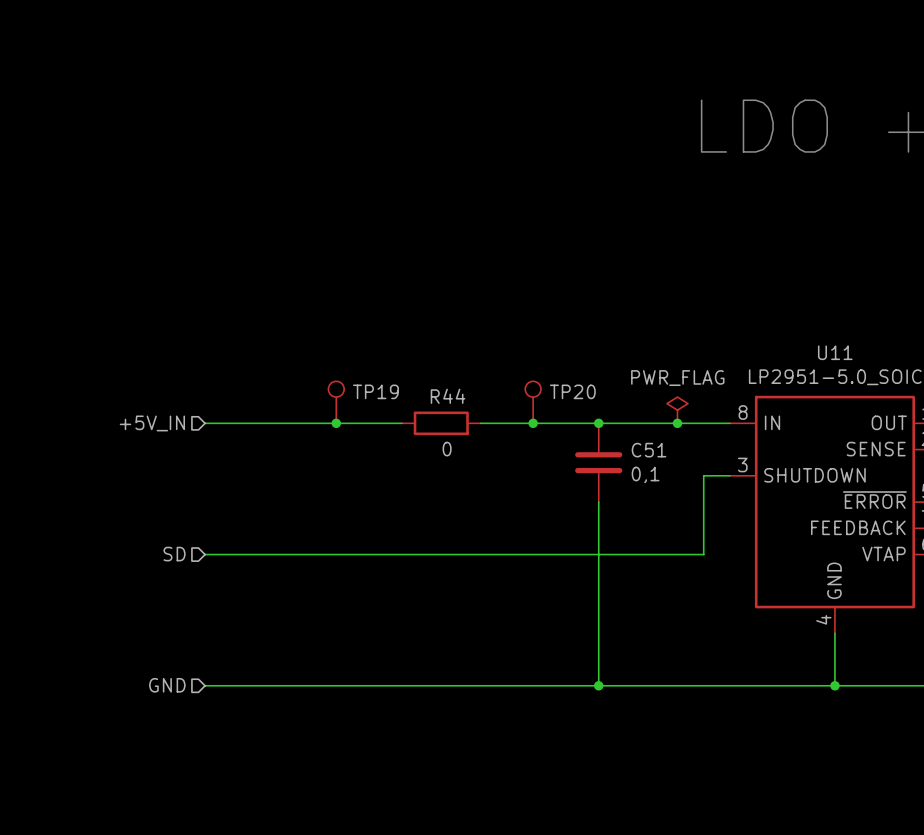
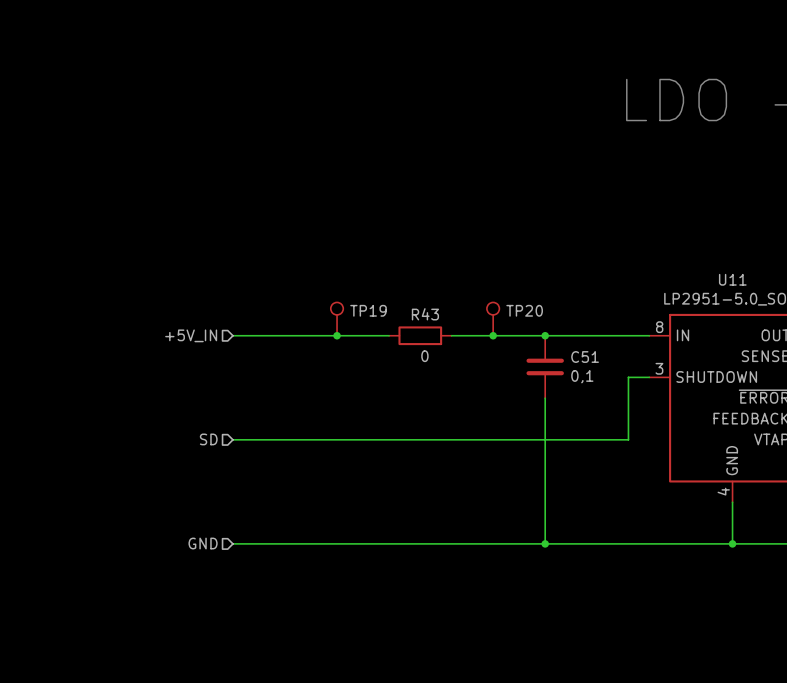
R44 name: R44 (448, 396) -> R43 (425, 314)
power symbol: PWR_FLAG (677, 410) -> none
junction: (677, 423) -> none

